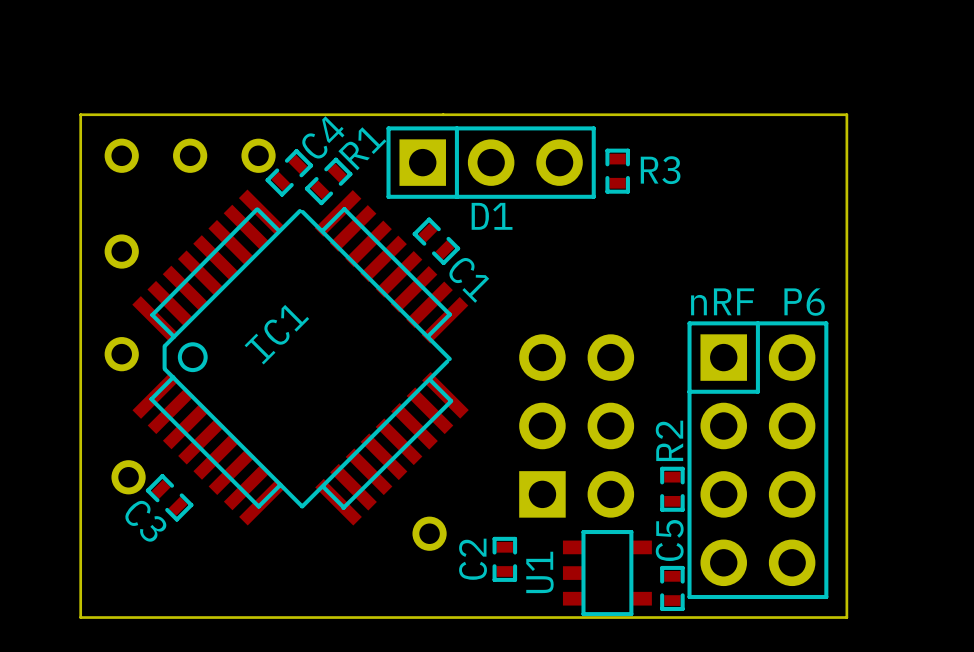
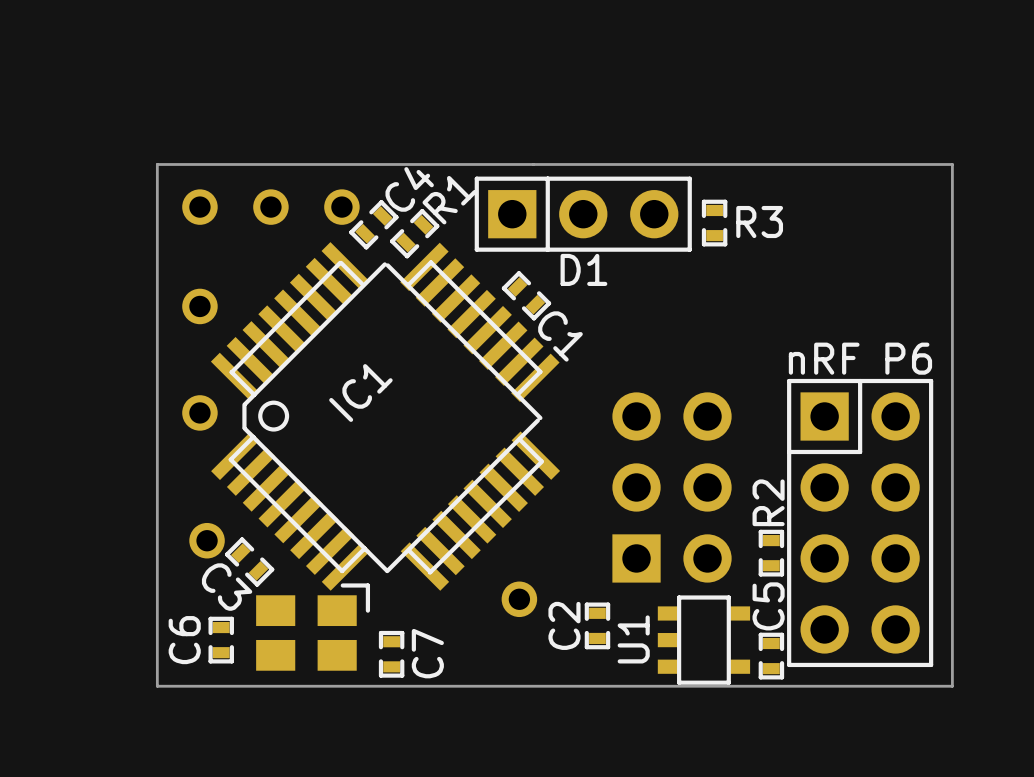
part: none -> (313, 627)
C6: none -> (221, 640)
C7: none -> (391, 654)

